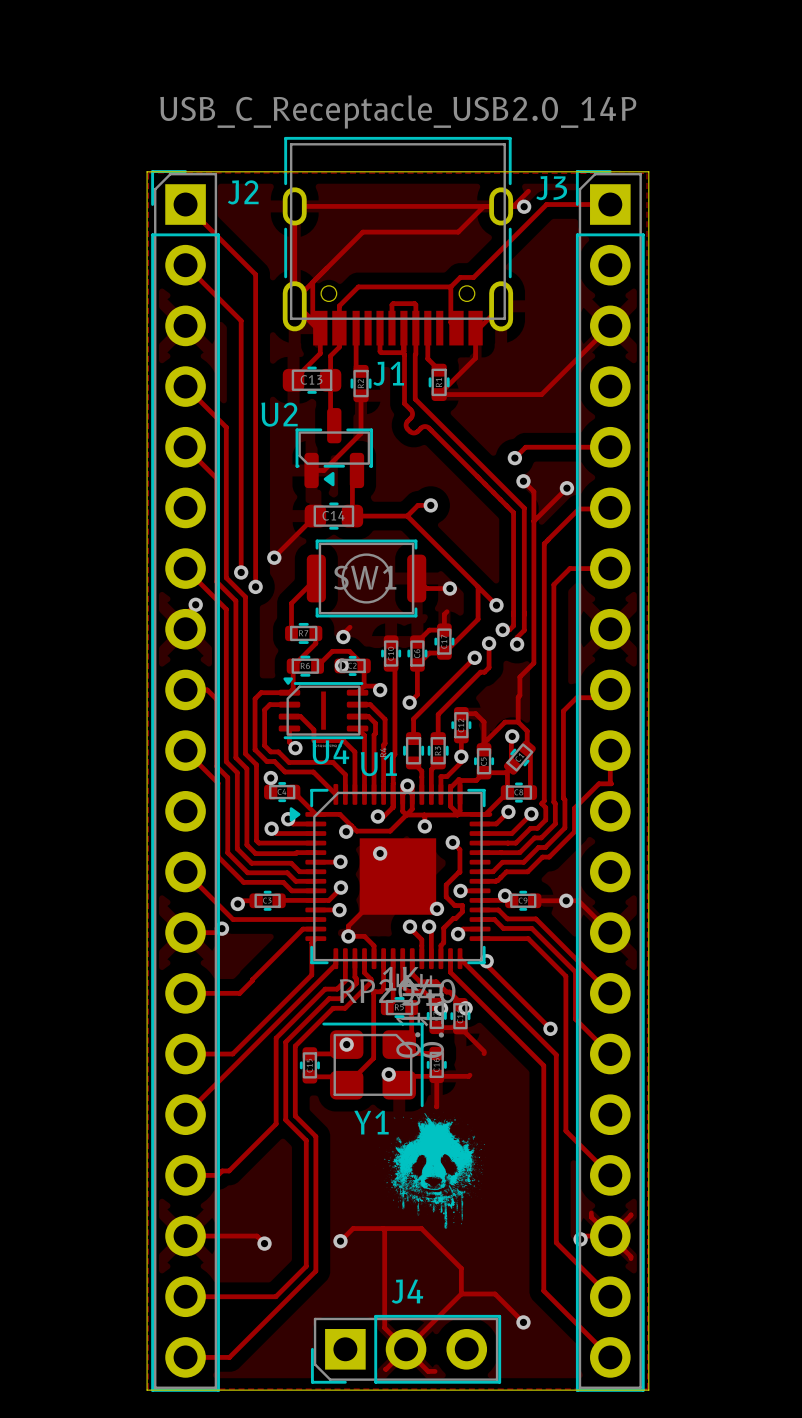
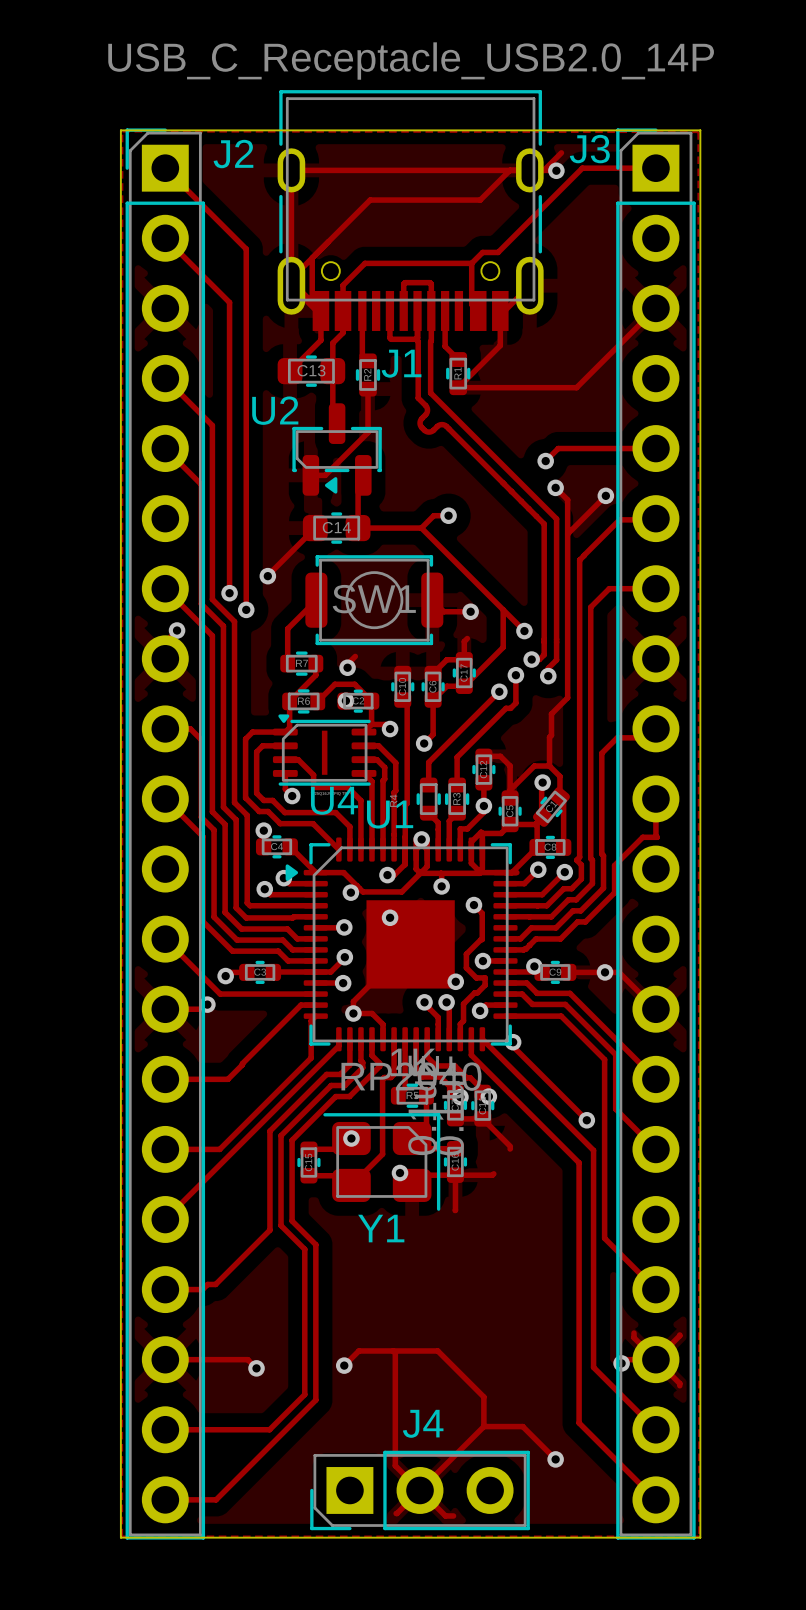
drawing: [375, 1111, 490, 1229] -> none

